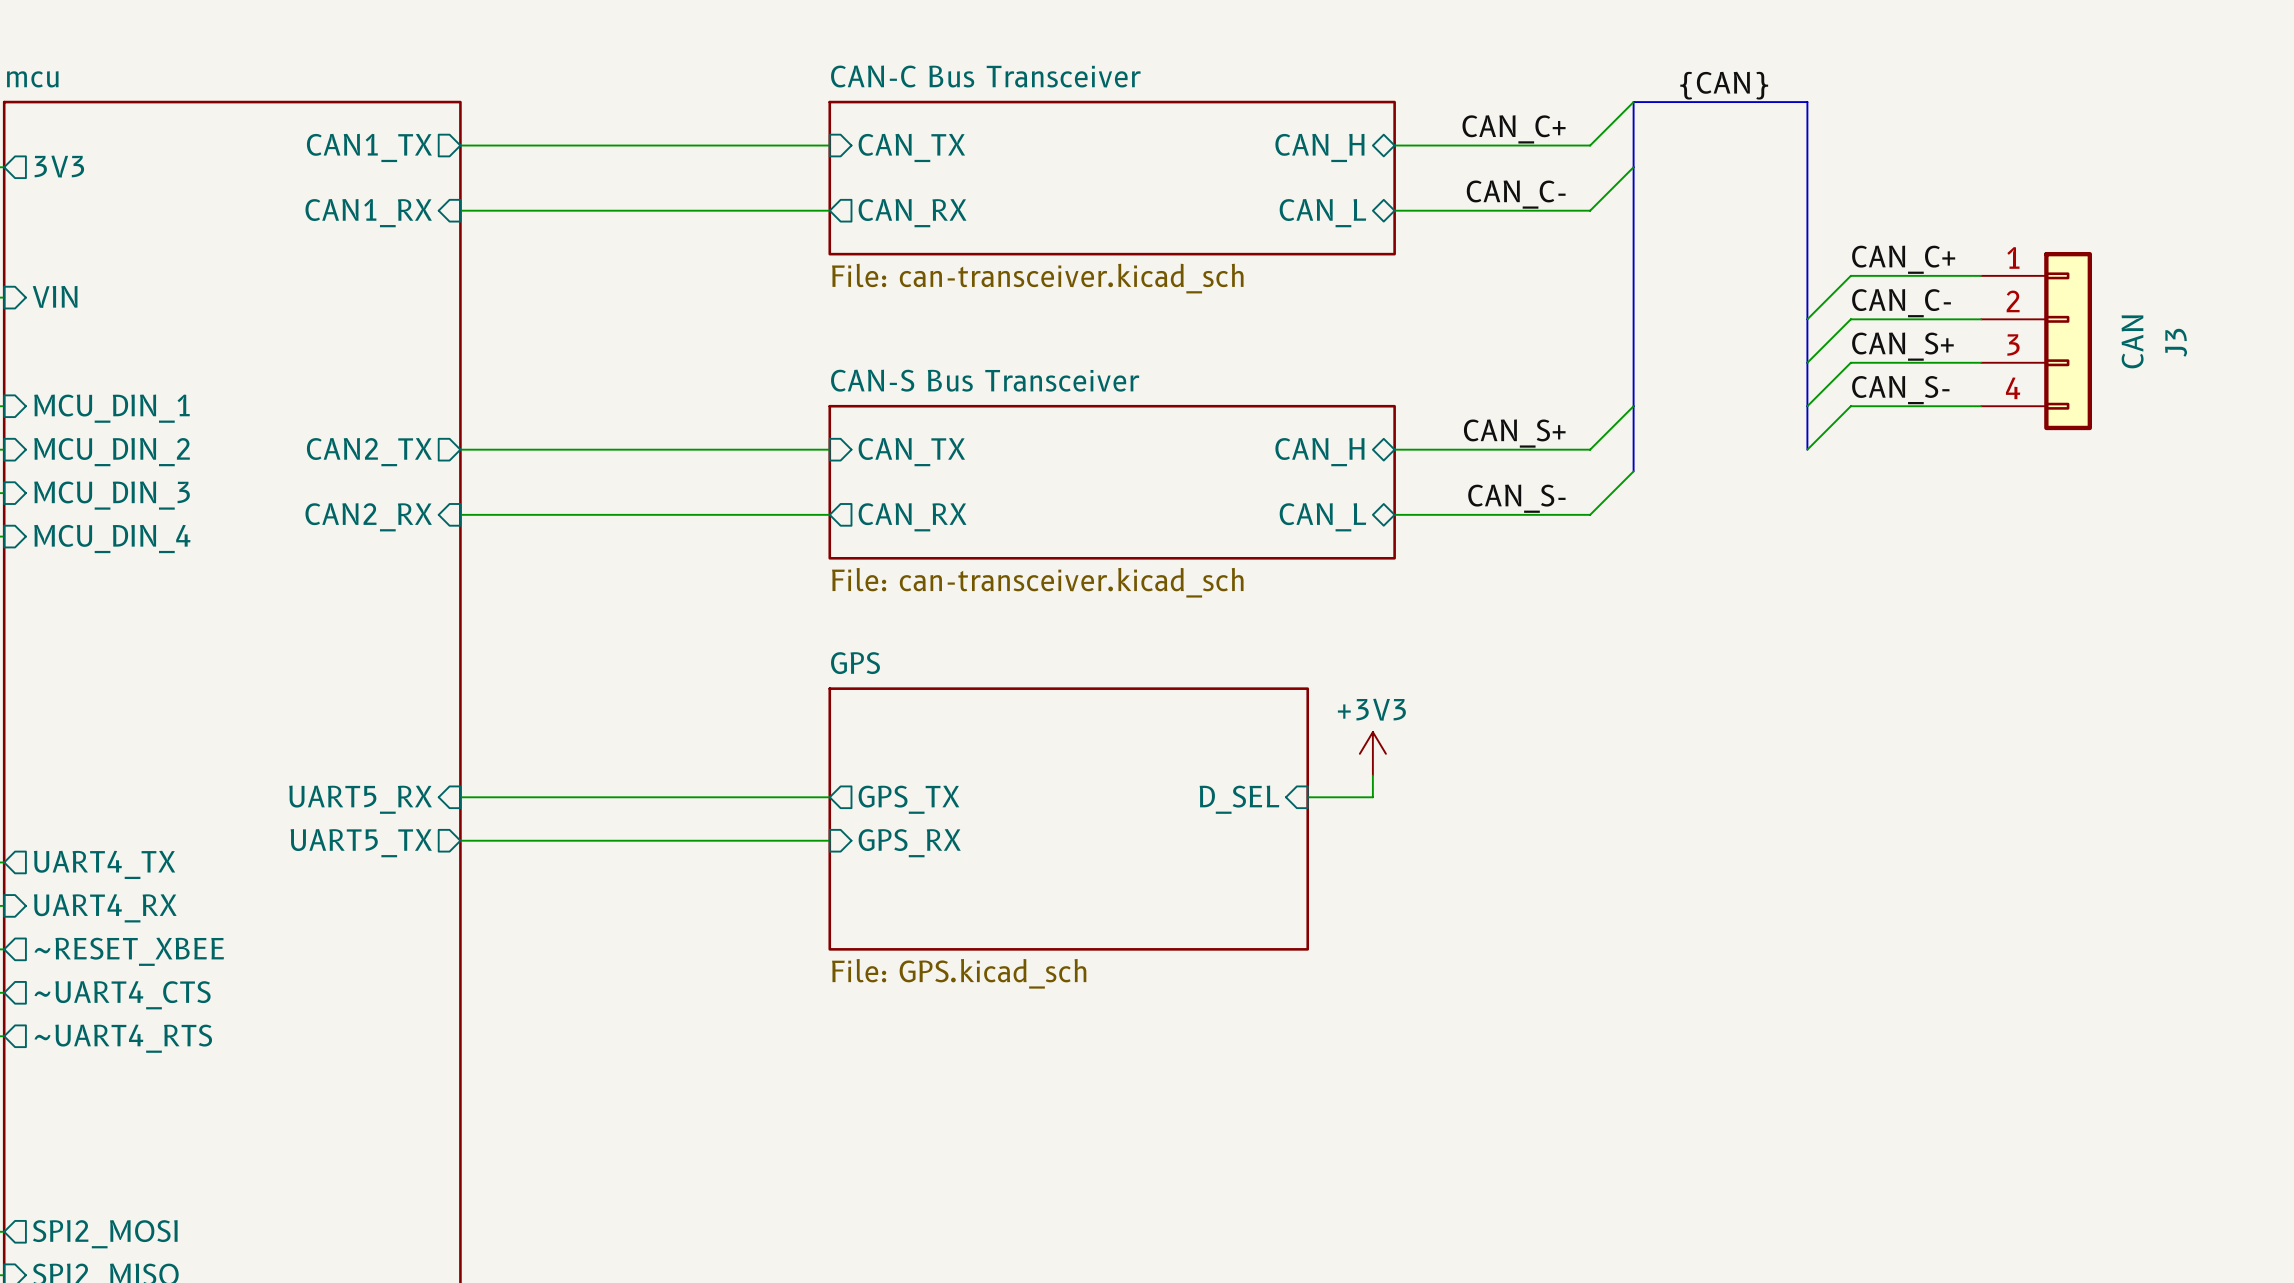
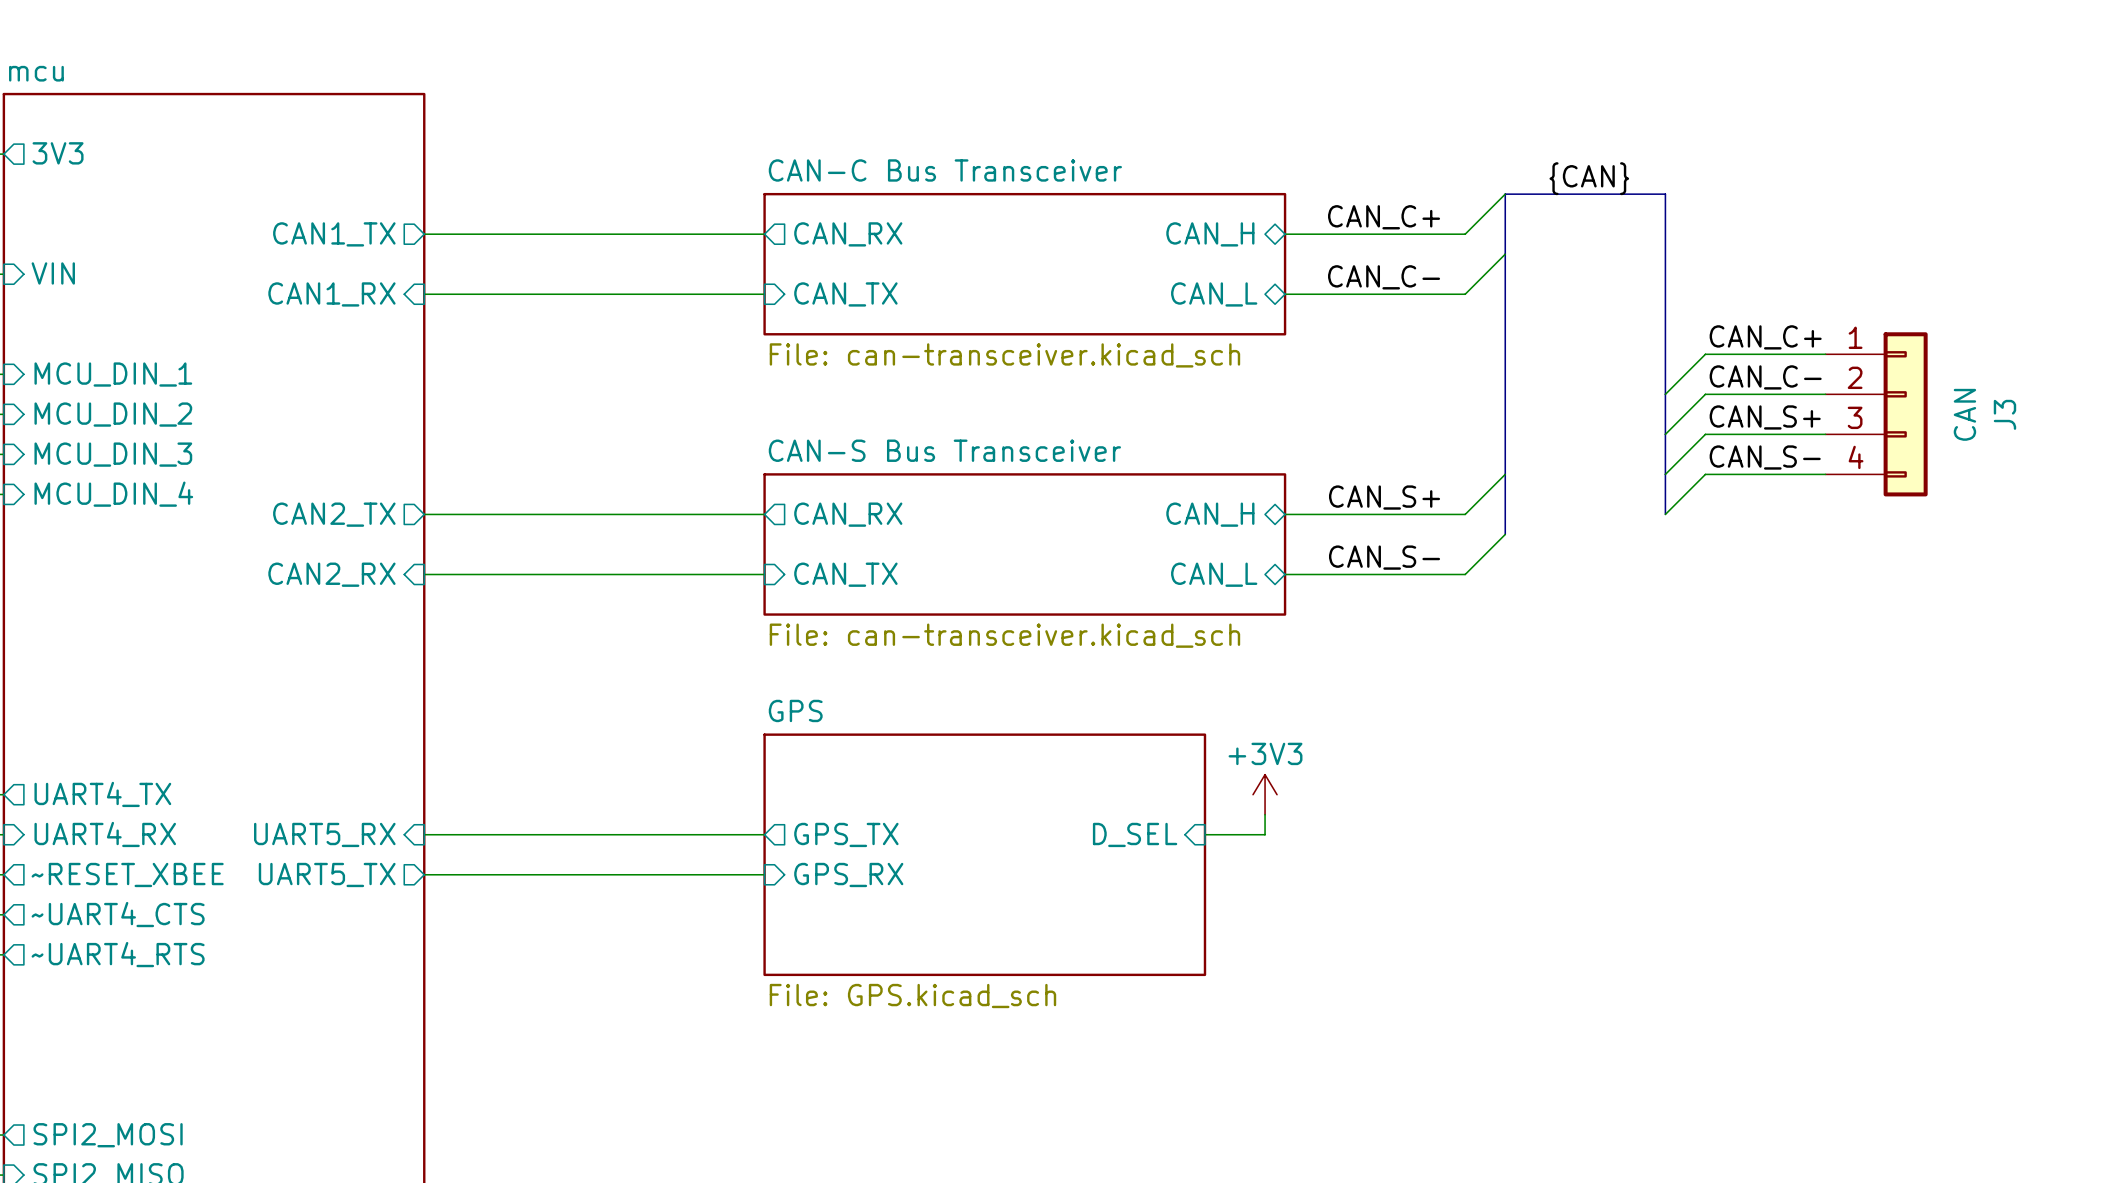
label position: {CAN} (1724, 85) -> {CAN} (1589, 178)
wire: (1633, 102) (1590, 145) (1394, 145) -> (1505, 194) (1465, 234) (1285, 234)
label position: CAN_C+ (1514, 129) -> CAN_C+ (1384, 217)
wire: (460, 145) (829, 145) -> (424, 234) (764, 234)
sheet pin position: CAN1_TX (369, 147) -> CAN1_TX (334, 234)
sheet pin: CAN_TX (911, 147) -> none
sheet pin: CAN_H (1319, 147) -> none
wire: (1633, 167) (1590, 210) (1394, 210) -> (1505, 254) (1465, 294) (1285, 294)
sheet CAN-C Bus Transceiver position: (1112, 178) -> (1024, 264)
label position: CAN_C- (1516, 194) -> CAN_C- (1384, 277)
wire: (460, 210) (829, 210) -> (424, 294) (764, 294)
bus: (1633, 210) (1633, 102) (1807, 102) (1807, 210) -> (1505, 194) (1665, 194)
sheet pin position: CAN1_RX (368, 213) -> CAN1_RX (331, 294)
sheet pin position: CAN_RX (912, 213) -> CAN_RX (848, 234)
sheet pin: CAN_L (1322, 213) -> CAN_H (1210, 234)
label position: CAN_C+ (1903, 259) -> CAN_C+ (1765, 337)
wire: (1981, 275) (1850, 275) (1807, 319) -> (1825, 354) (1705, 354) (1665, 394)
label position: CAN_C- (1901, 303) -> CAN_C- (1765, 377)
wire: (1981, 319) (1850, 319) (1807, 362) -> (1825, 394) (1705, 394) (1665, 434)
sheet pin: none -> CAN_TX (845, 294)
sheet pin: none -> CAN_L (1214, 294)
J3 position: (2036, 341) -> (1876, 414)
label position: CAN_S+ (1902, 346) -> CAN_S+ (1765, 417)
wire: (1981, 362) (1850, 362) (1807, 406) -> (1825, 434) (1705, 434) (1665, 474)
label position: CAN_S- (1900, 390) -> CAN_S- (1765, 457)
wire: (1633, 406) (1590, 449) (1394, 449) -> (1505, 474) (1465, 514) (1285, 514)
wire: (1981, 406) (1850, 406) (1807, 449) -> (1825, 474) (1705, 474) (1665, 514)
label position: CAN_S+ (1514, 433) -> CAN_S+ (1384, 497)
wire: (460, 449) (829, 449) -> (424, 514) (764, 514)
bus: none -> (1665, 414) (1665, 514)
sheet pin position: CAN2_TX (369, 452) -> CAN2_TX (334, 514)
sheet pin: CAN_TX (911, 452) -> none
sheet pin: CAN_H (1319, 452) -> none
wire: (1633, 471) (1590, 514) (1394, 514) -> (1505, 534) (1465, 574) (1285, 574)
bus: none -> (1505, 434) (1505, 534)
sheet CAN-S Bus Transceiver position: (1112, 482) -> (1024, 544)
label position: CAN_S- (1516, 498) -> CAN_S- (1384, 557)
wire: (460, 514) (829, 514) -> (424, 574) (764, 574)
sheet pin position: CAN2_RX (368, 517) -> CAN2_RX (331, 574)
sheet pin position: CAN_RX (912, 517) -> CAN_RX (848, 514)
sheet pin: CAN_L (1322, 517) -> CAN_H (1210, 514)
sheet pin: none -> CAN_TX (845, 574)
sheet pin: none -> CAN_L (1214, 574)
power symbol position: +3V3 (1372, 753) -> +3V3 (1265, 794)
wire: (1372, 775) (1372, 797) (1307, 797) -> (1265, 814) (1265, 834) (1204, 834)
wire: (460, 797) (829, 797) -> (424, 834) (764, 834)
sheet pin position: UART5_RX (360, 799) -> UART5_RX (324, 834)
sheet pin position: GPS_TX (908, 799) -> GPS_TX (846, 834)
sheet pin position: D_SEL (1239, 799) -> D_SEL (1135, 834)
sheet GPS position: (1068, 819) -> (984, 854)
wire: (460, 840) (829, 840) -> (424, 874) (764, 874)
sheet pin position: UART5_TX (361, 843) -> UART5_TX (327, 874)
sheet pin position: GPS_RX (909, 843) -> GPS_RX (848, 874)

